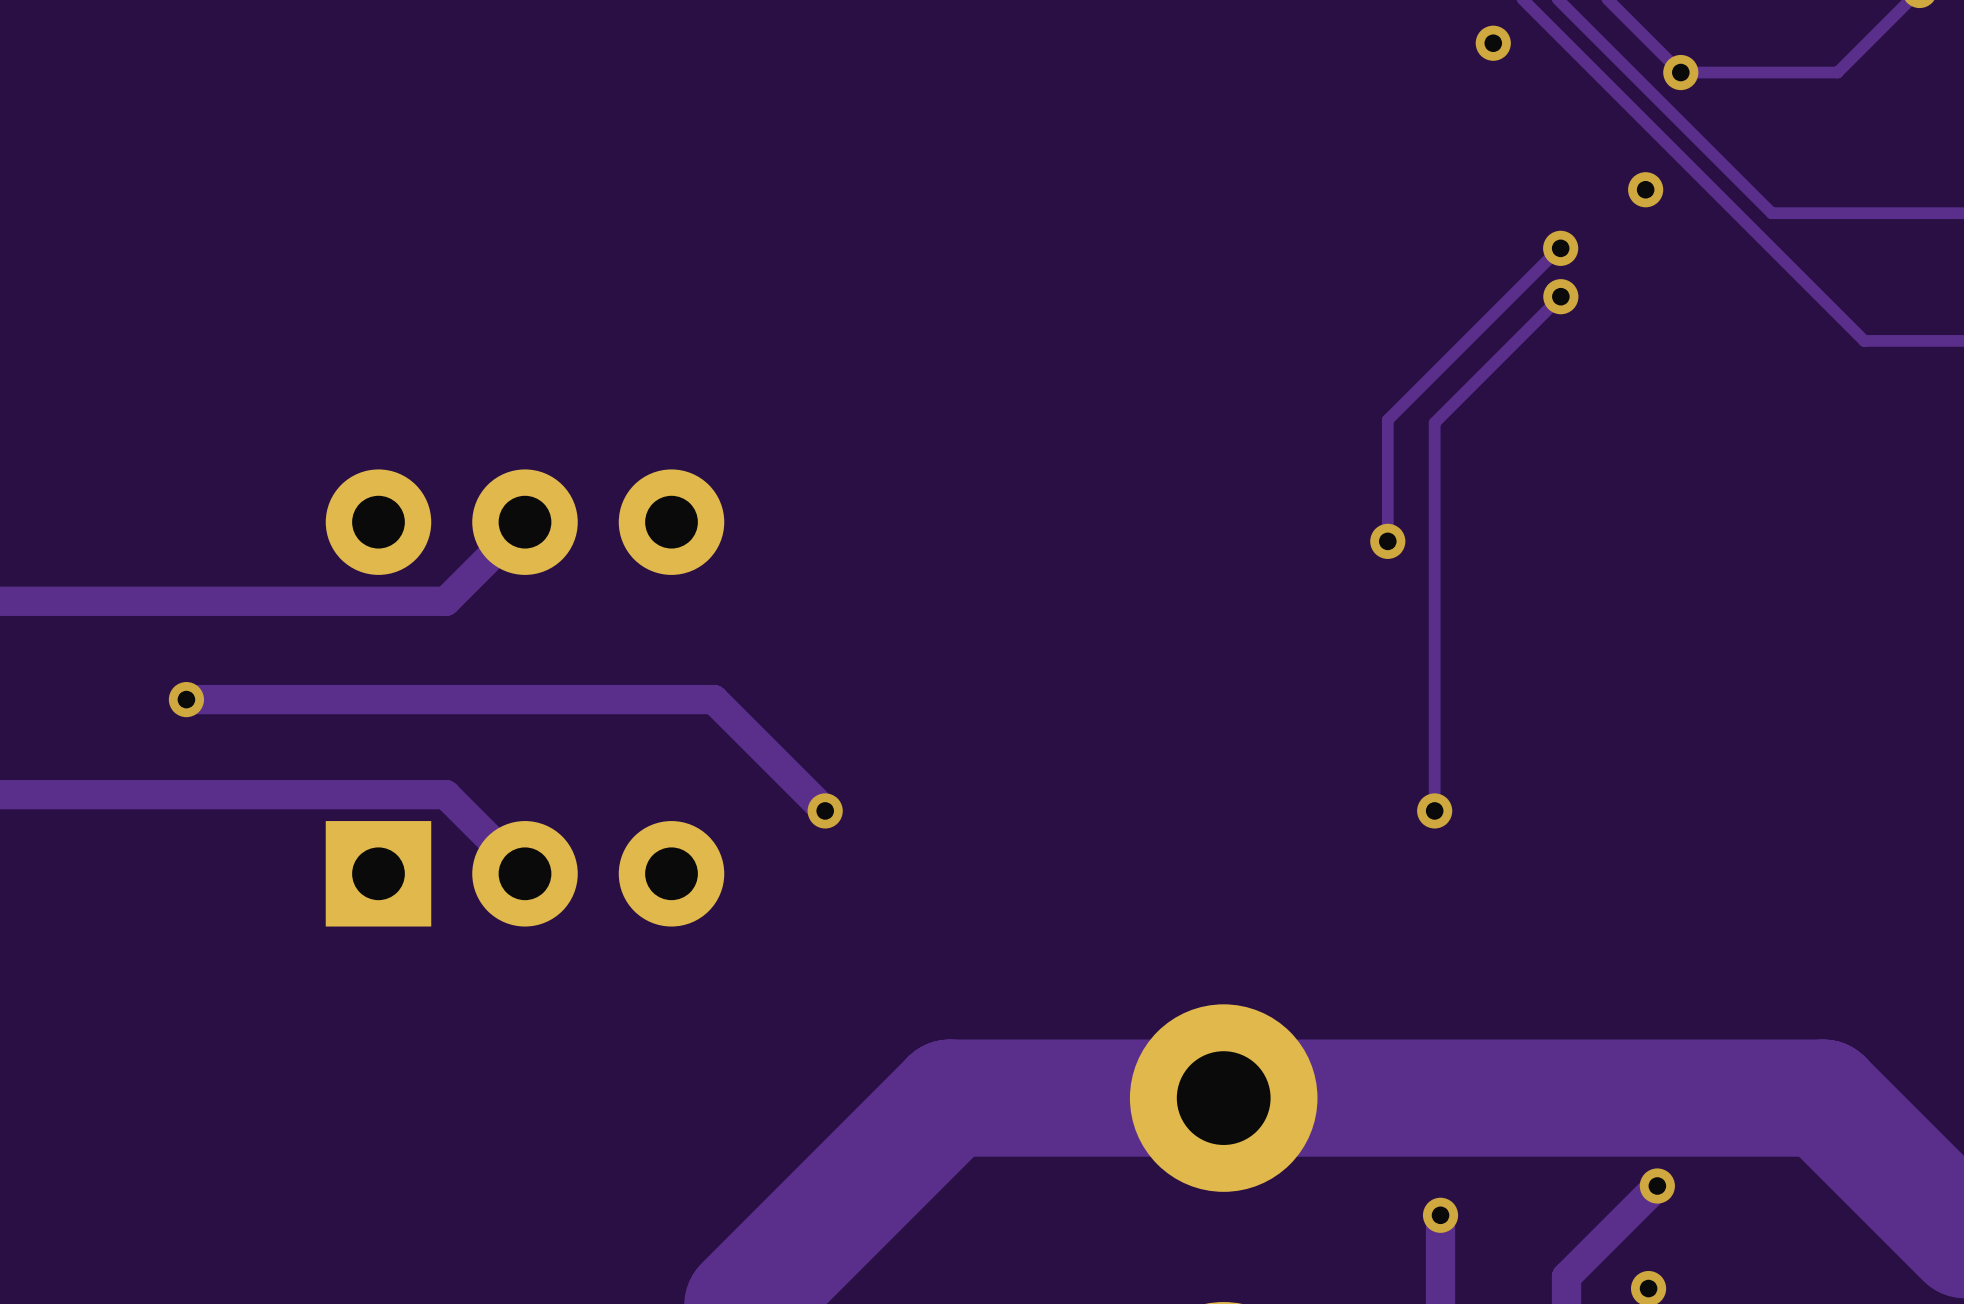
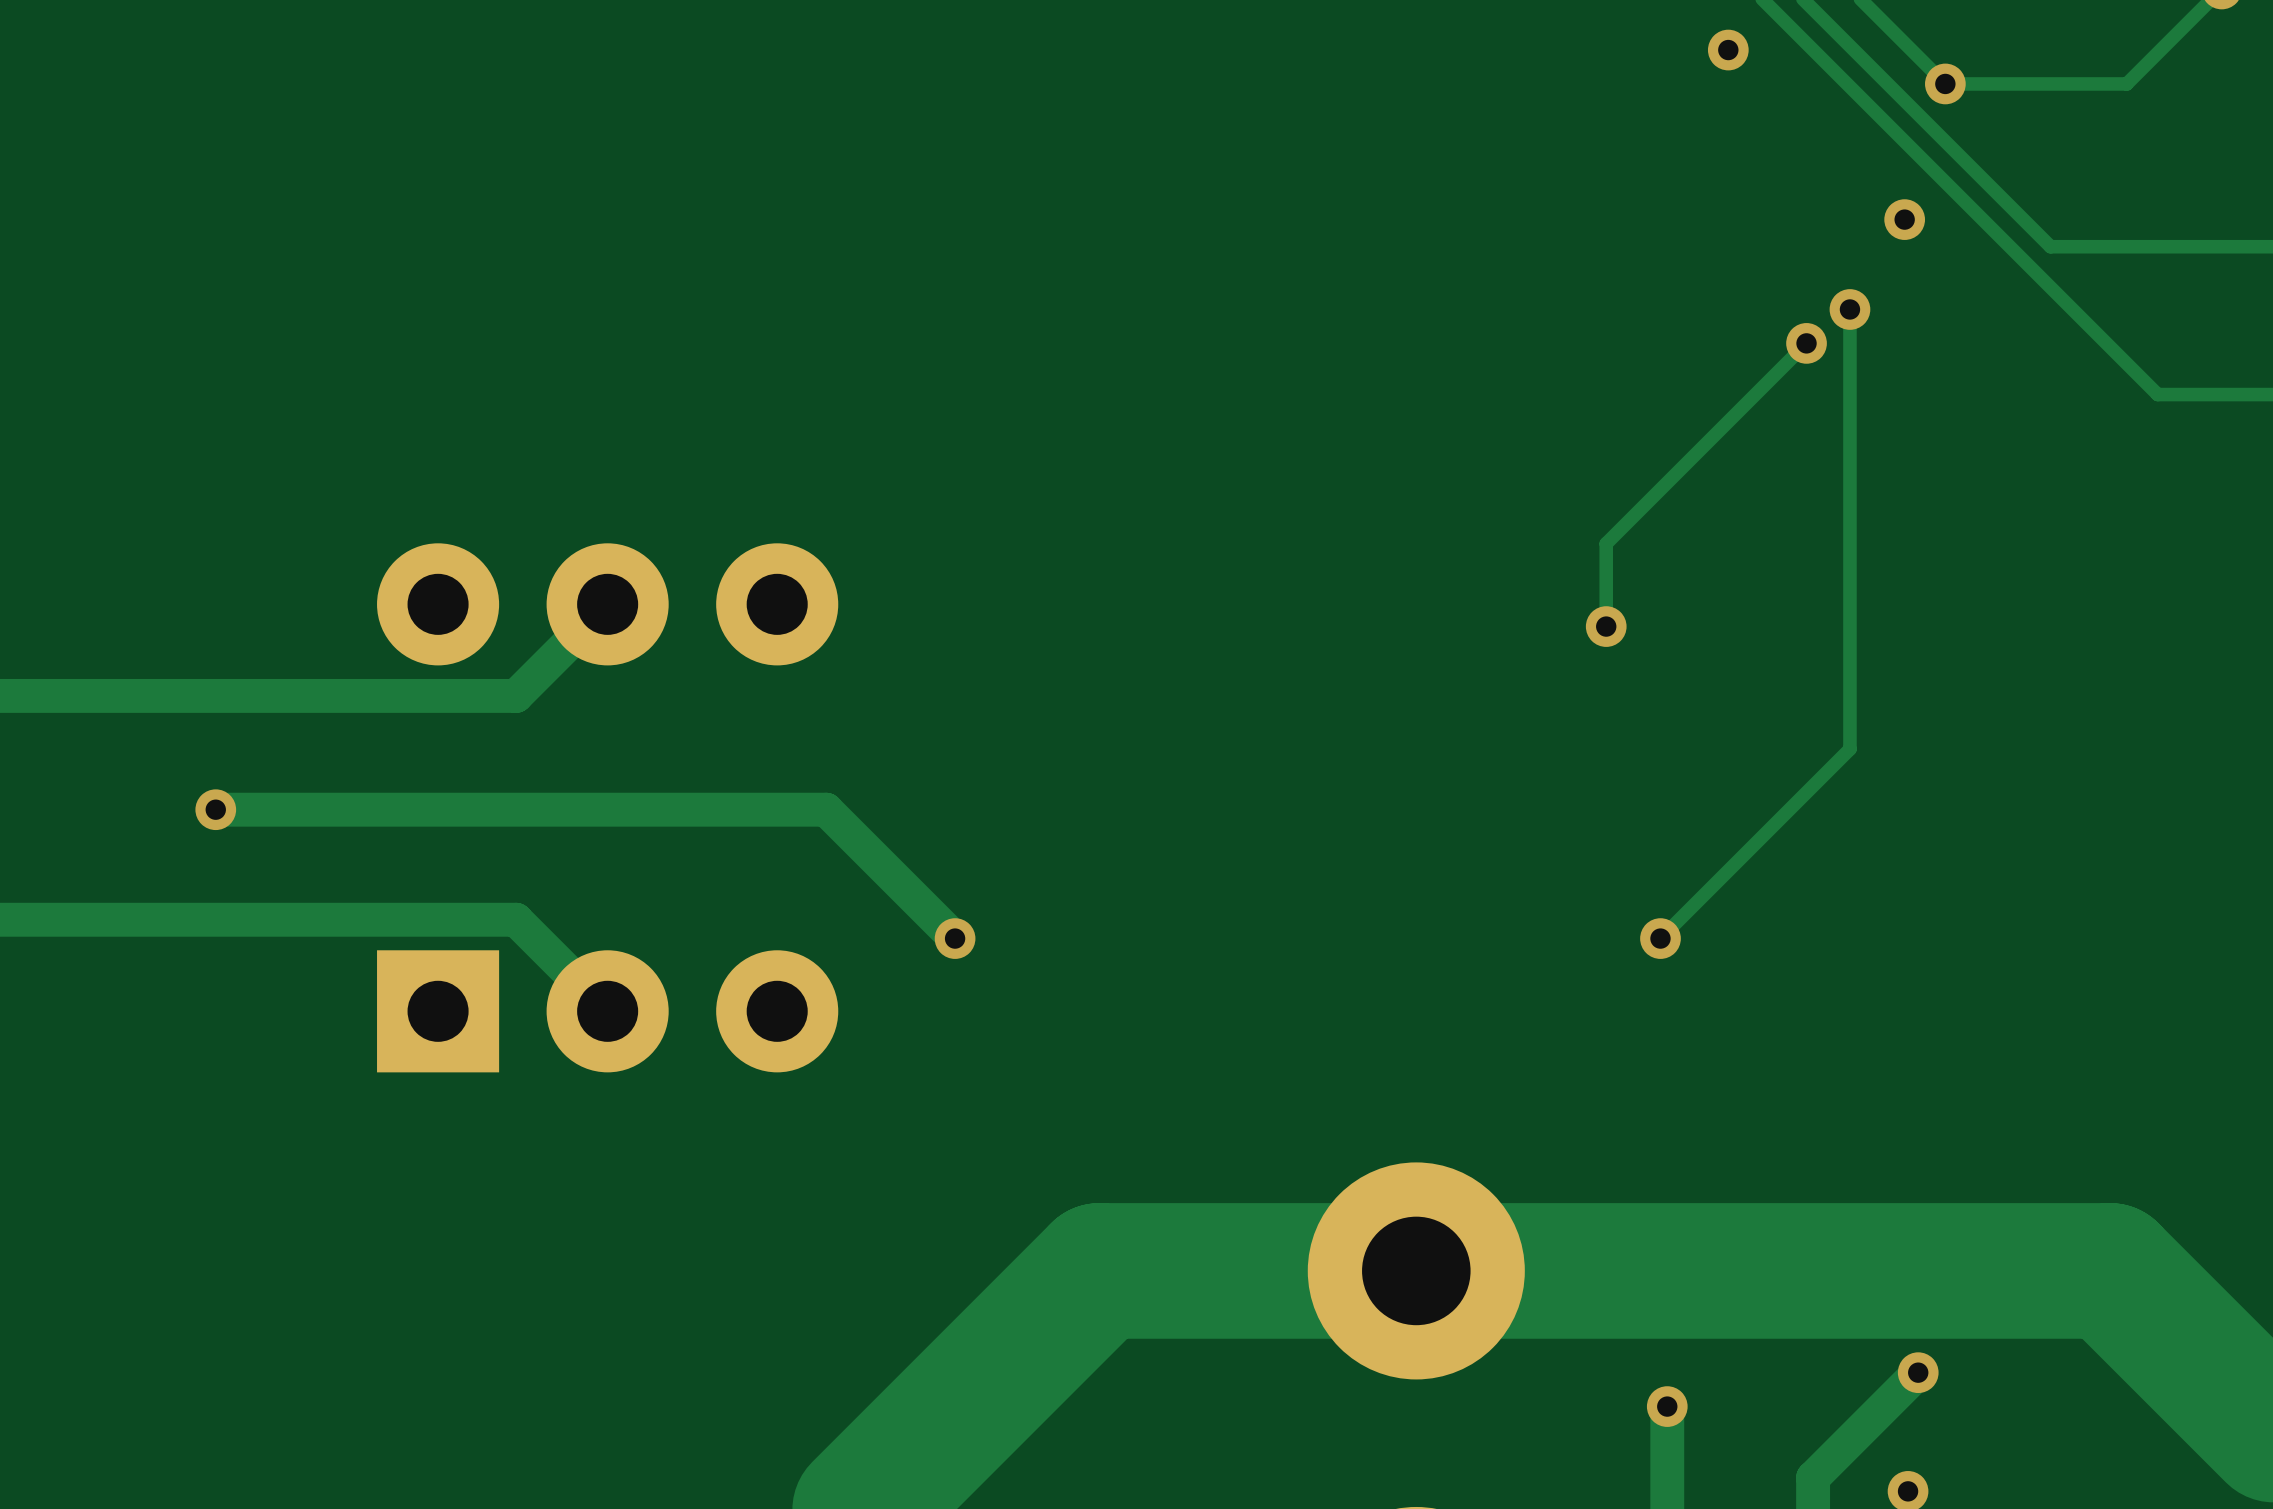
track: (1560, 248) (1387, 420) (1387, 469) -> (1660, 489) (1606, 543)
via position: (1560, 248) -> (1849, 309)
track: (1434, 422) (1434, 810) -> (1849, 309) (1849, 749) (1660, 938)

